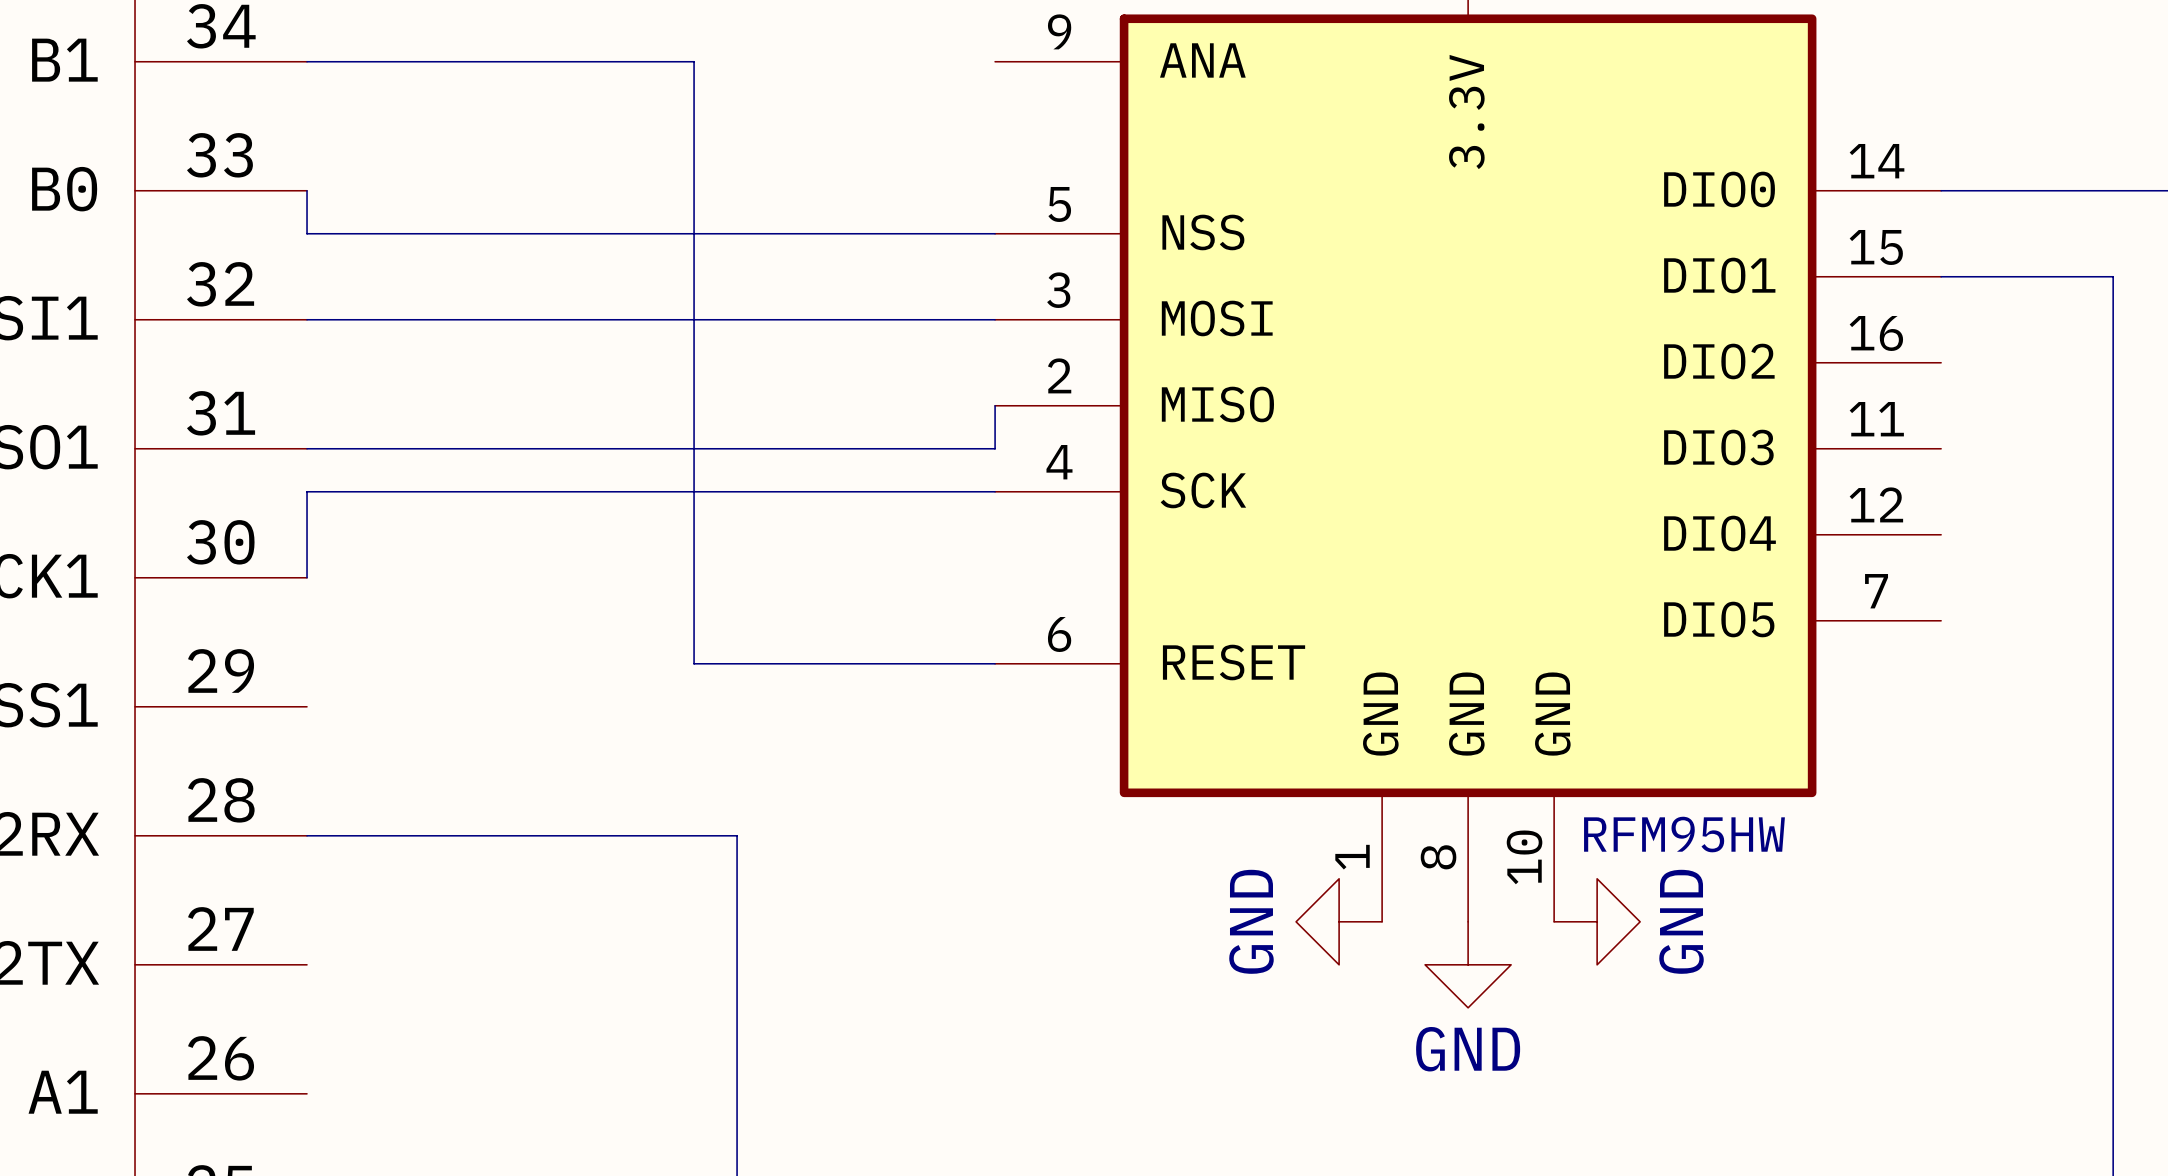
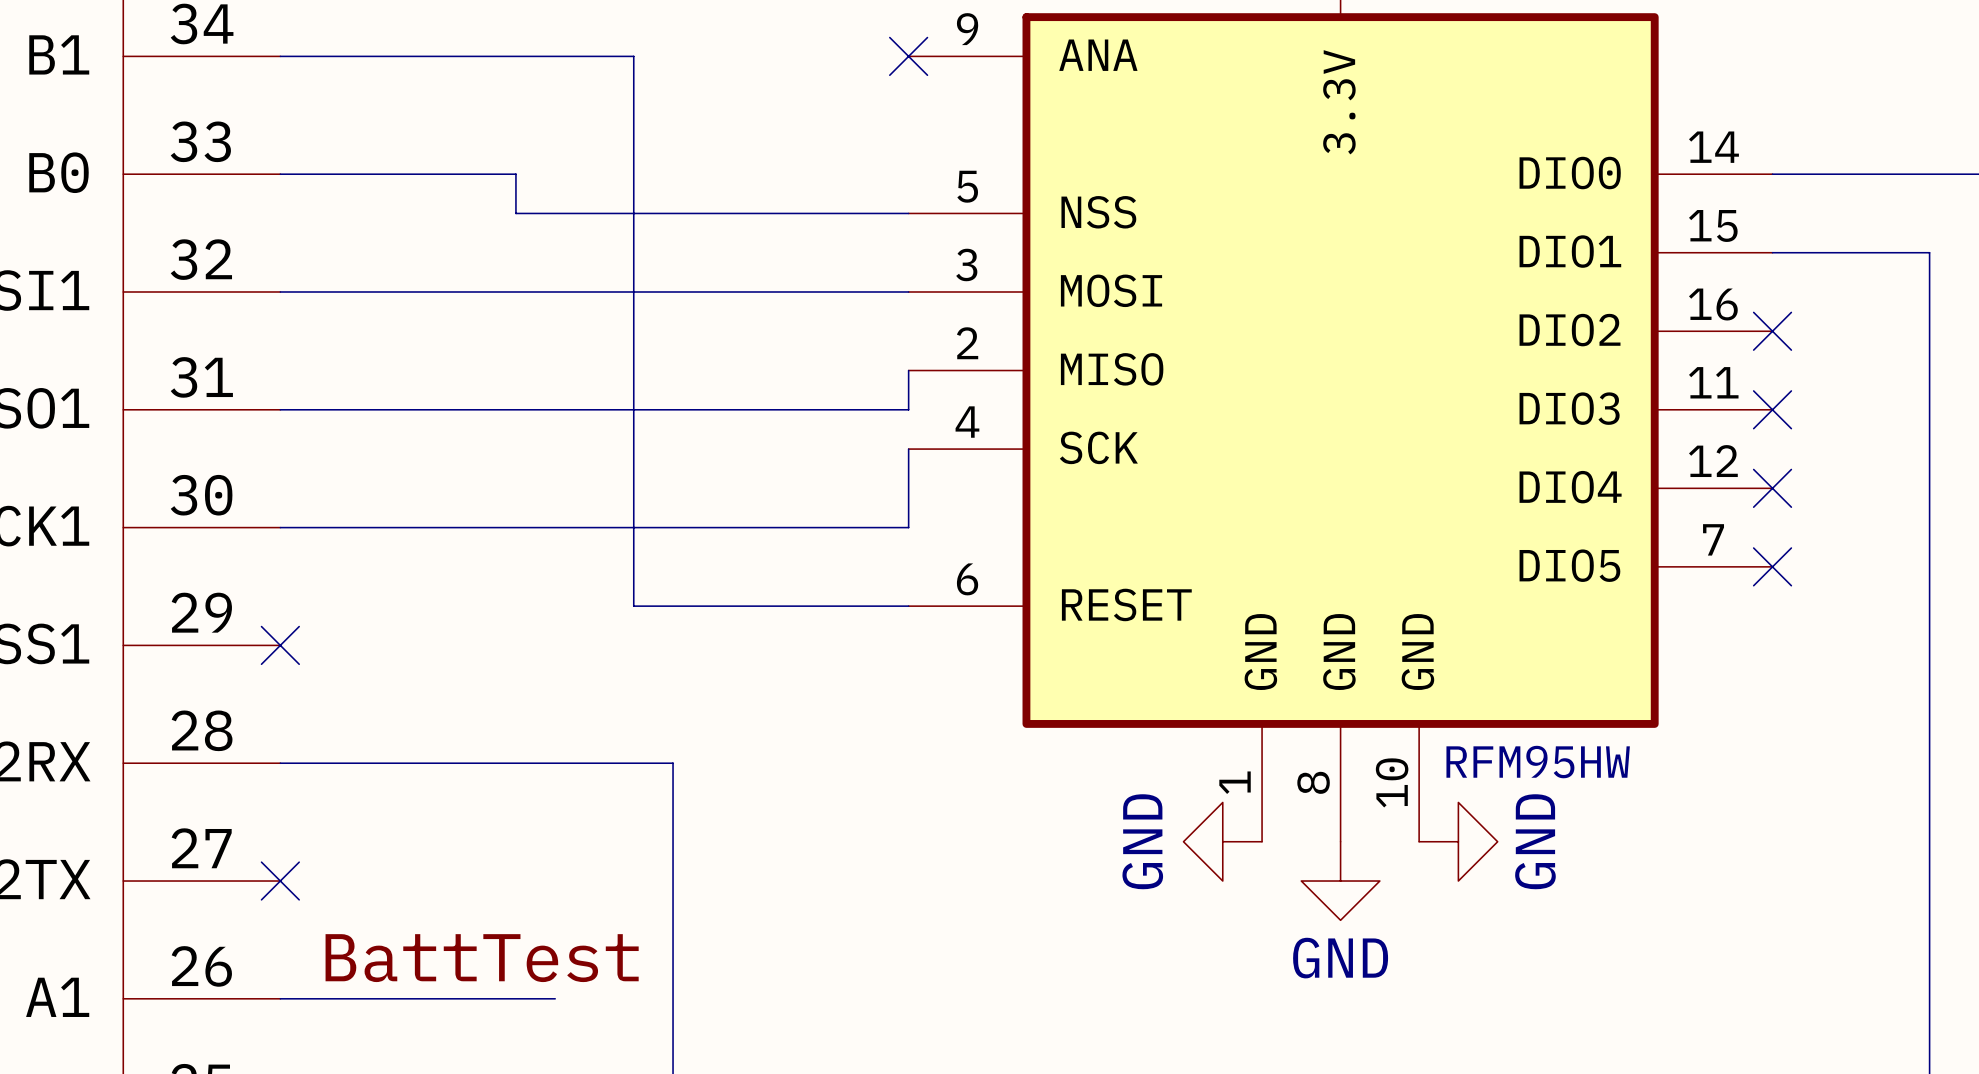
no-connect mark: none -> (908, 56)
wire: (307, 190) (307, 233) (565, 233) -> (280, 174) (515, 174) (515, 213)
no-connect mark: none -> (1772, 331)
no-connect mark: none -> (1772, 409)
wire: (995, 491) (307, 491) (307, 577) -> (908, 449) (908, 527) (280, 527)
no-connect mark: none -> (1772, 488)
no-connect mark: none -> (1772, 566)
no-connect mark: none -> (280, 645)
no-connect mark: none -> (280, 881)
label: none -> BattTest (482, 958)
wire: none -> (280, 998) (555, 998)

